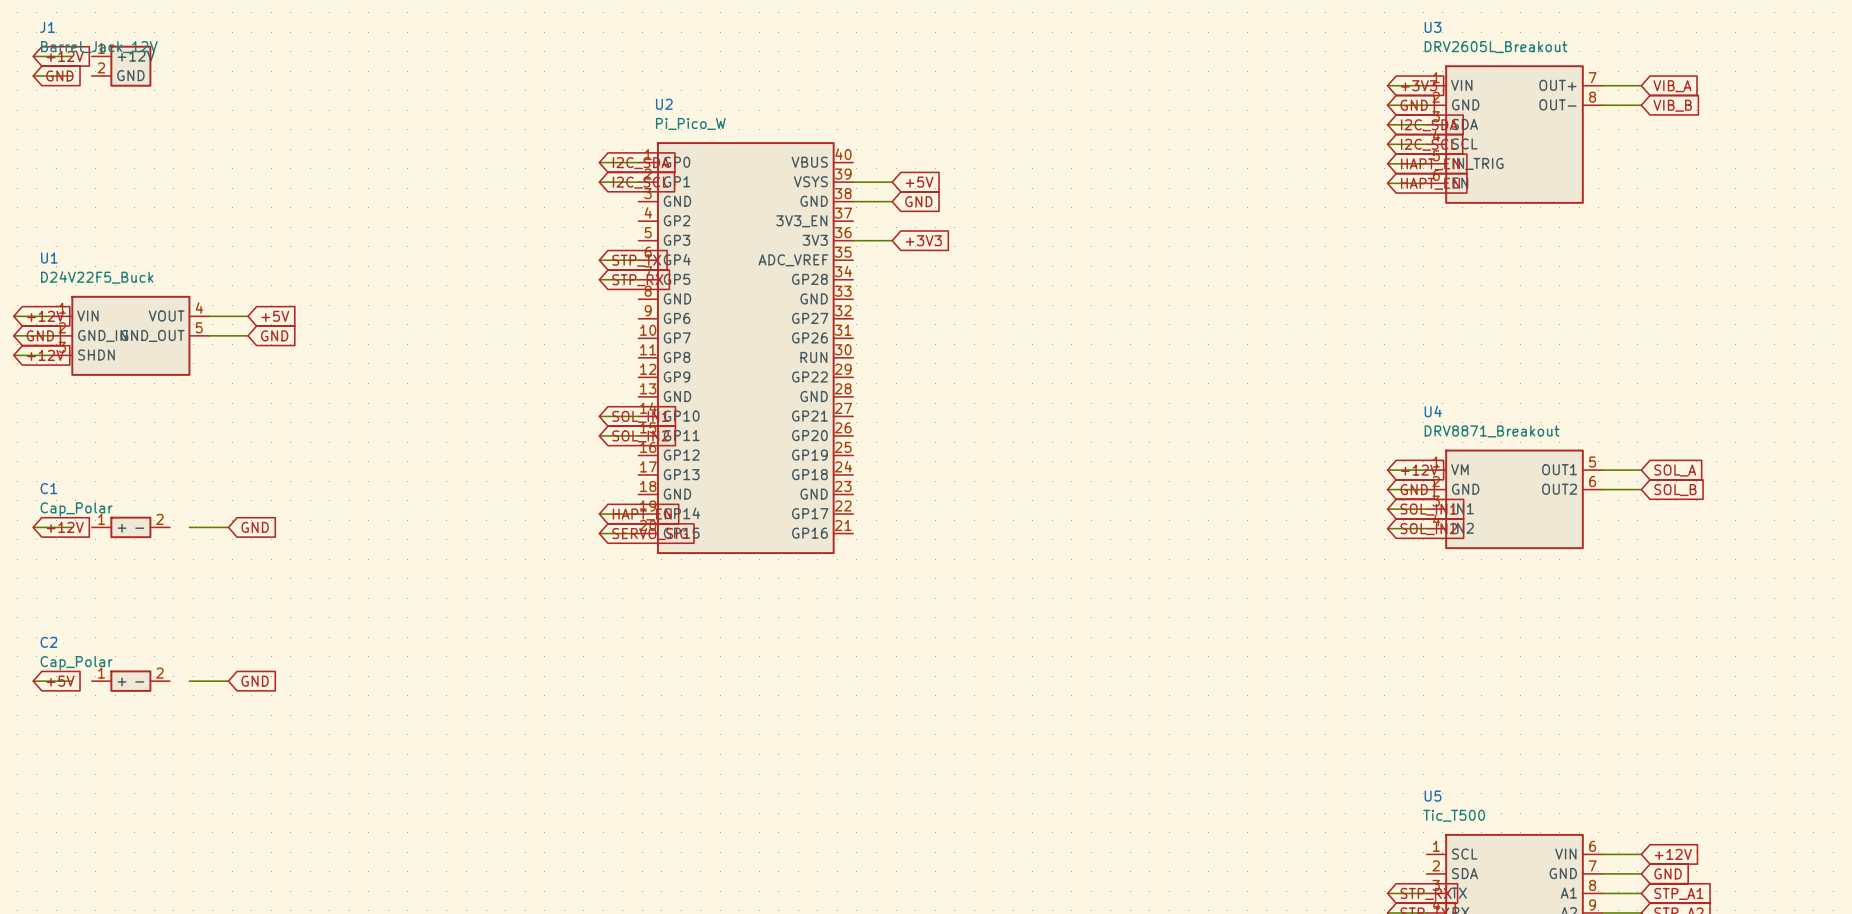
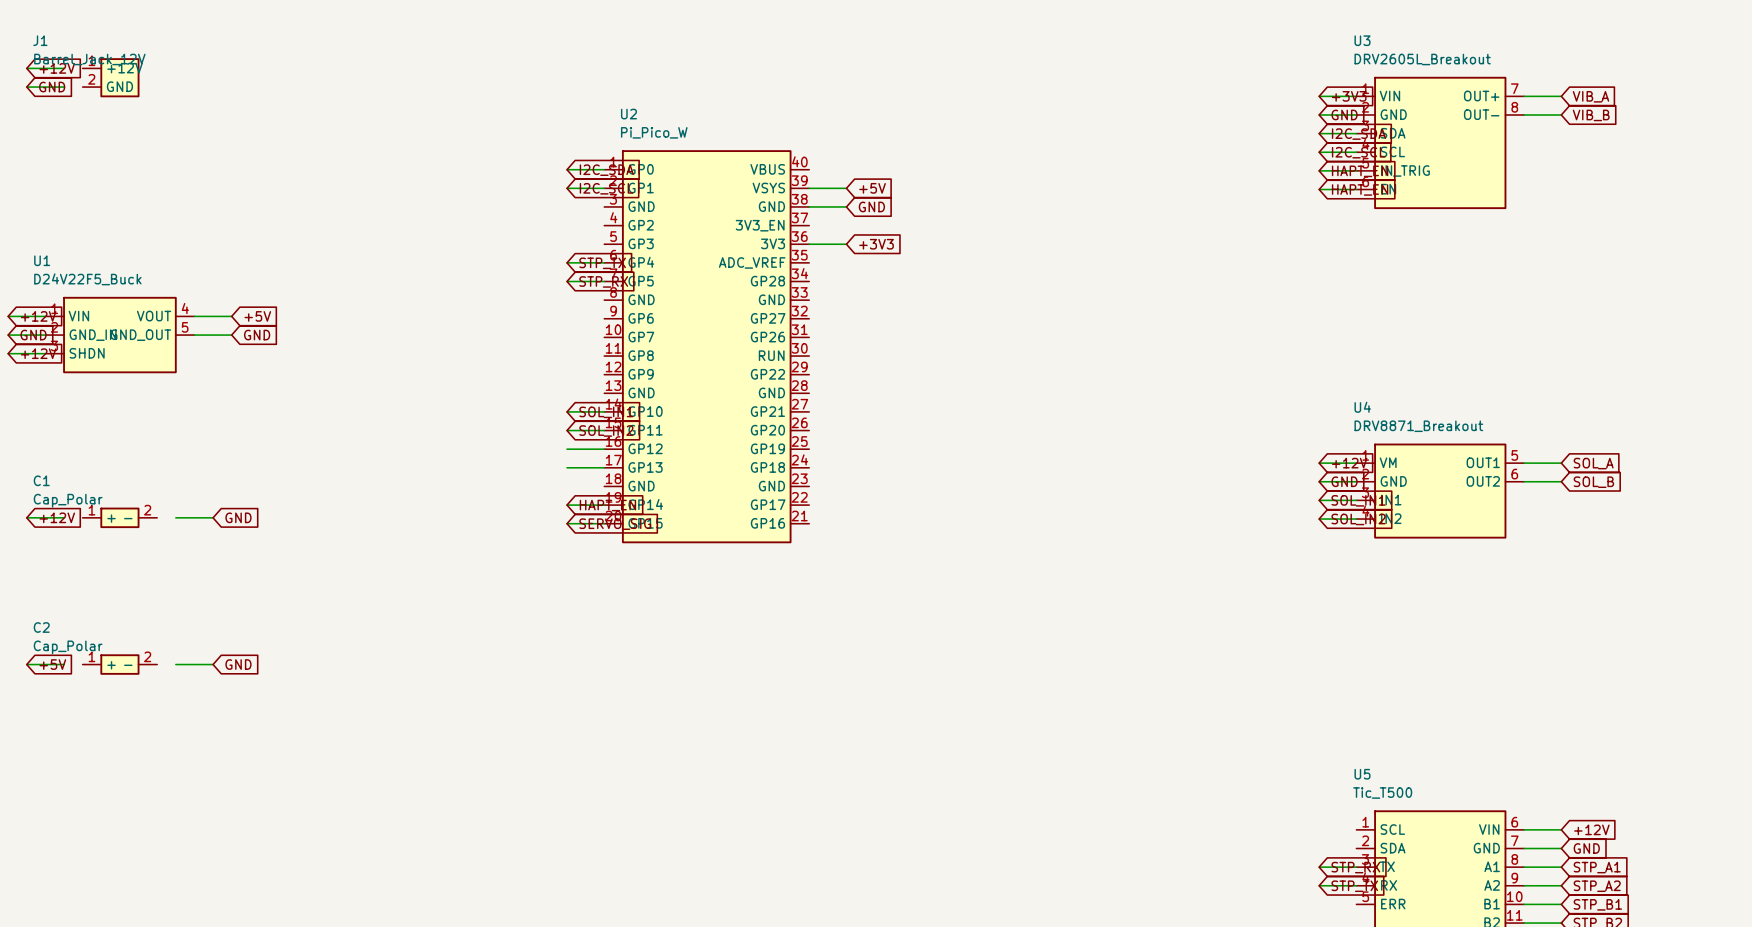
wire: none -> (567, 449) (604, 449)
wire: none -> (567, 467) (604, 467)

